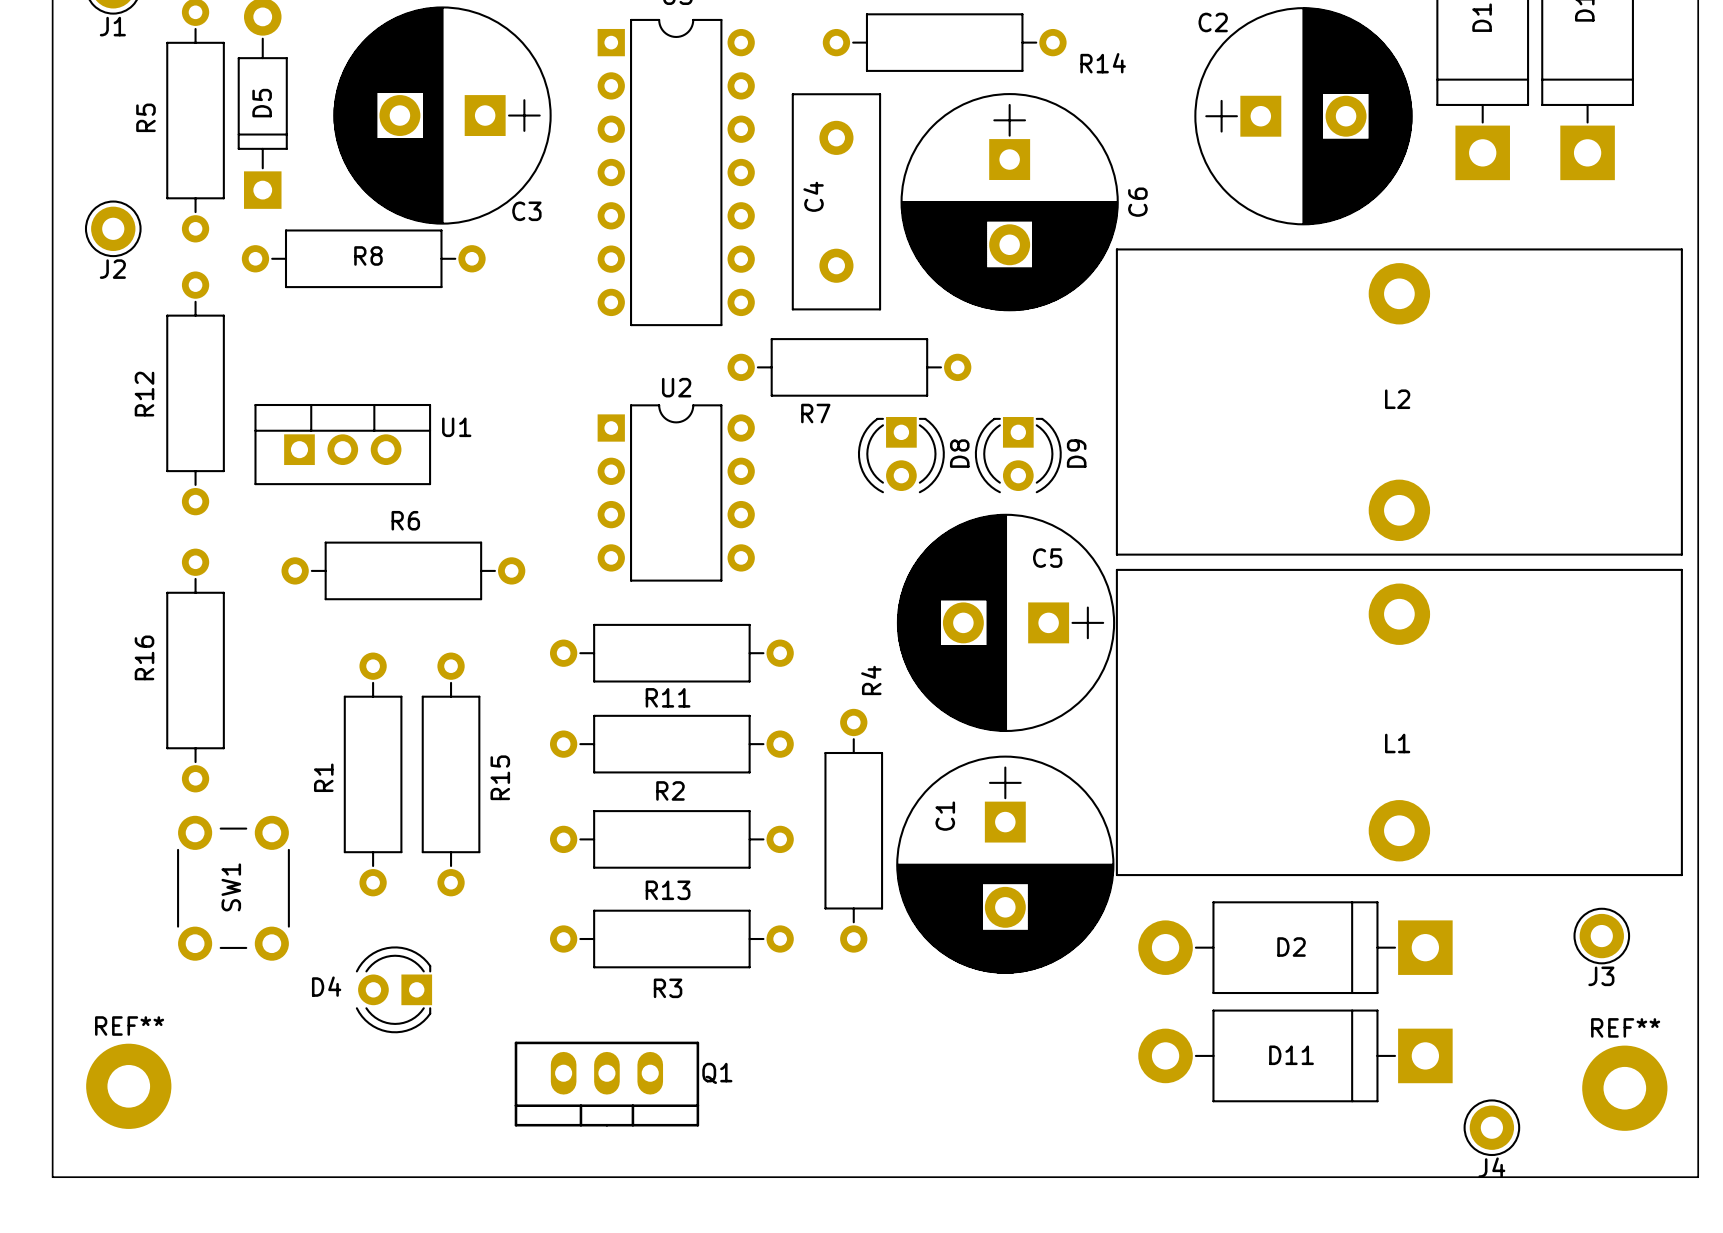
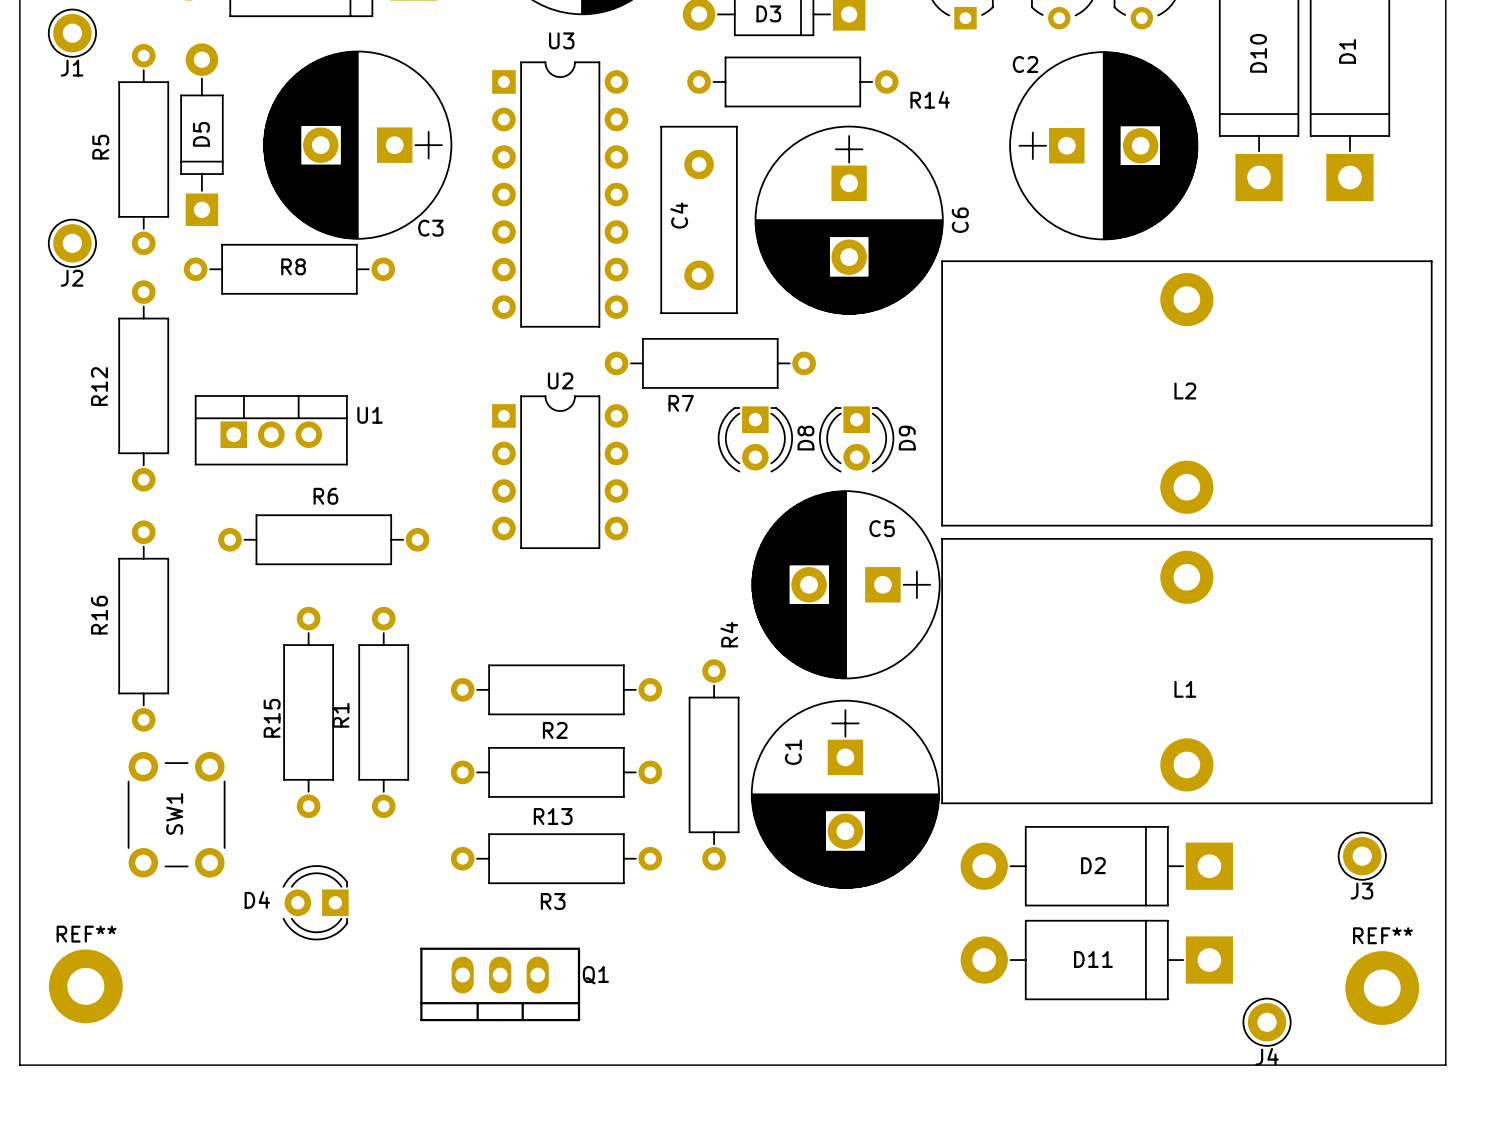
R11: (671, 653) -> none
R1 position: (373, 774) -> (383, 712)
R15 position: (451, 774) -> (308, 712)
R15 name position: R15 (500, 777) -> R15 (272, 718)

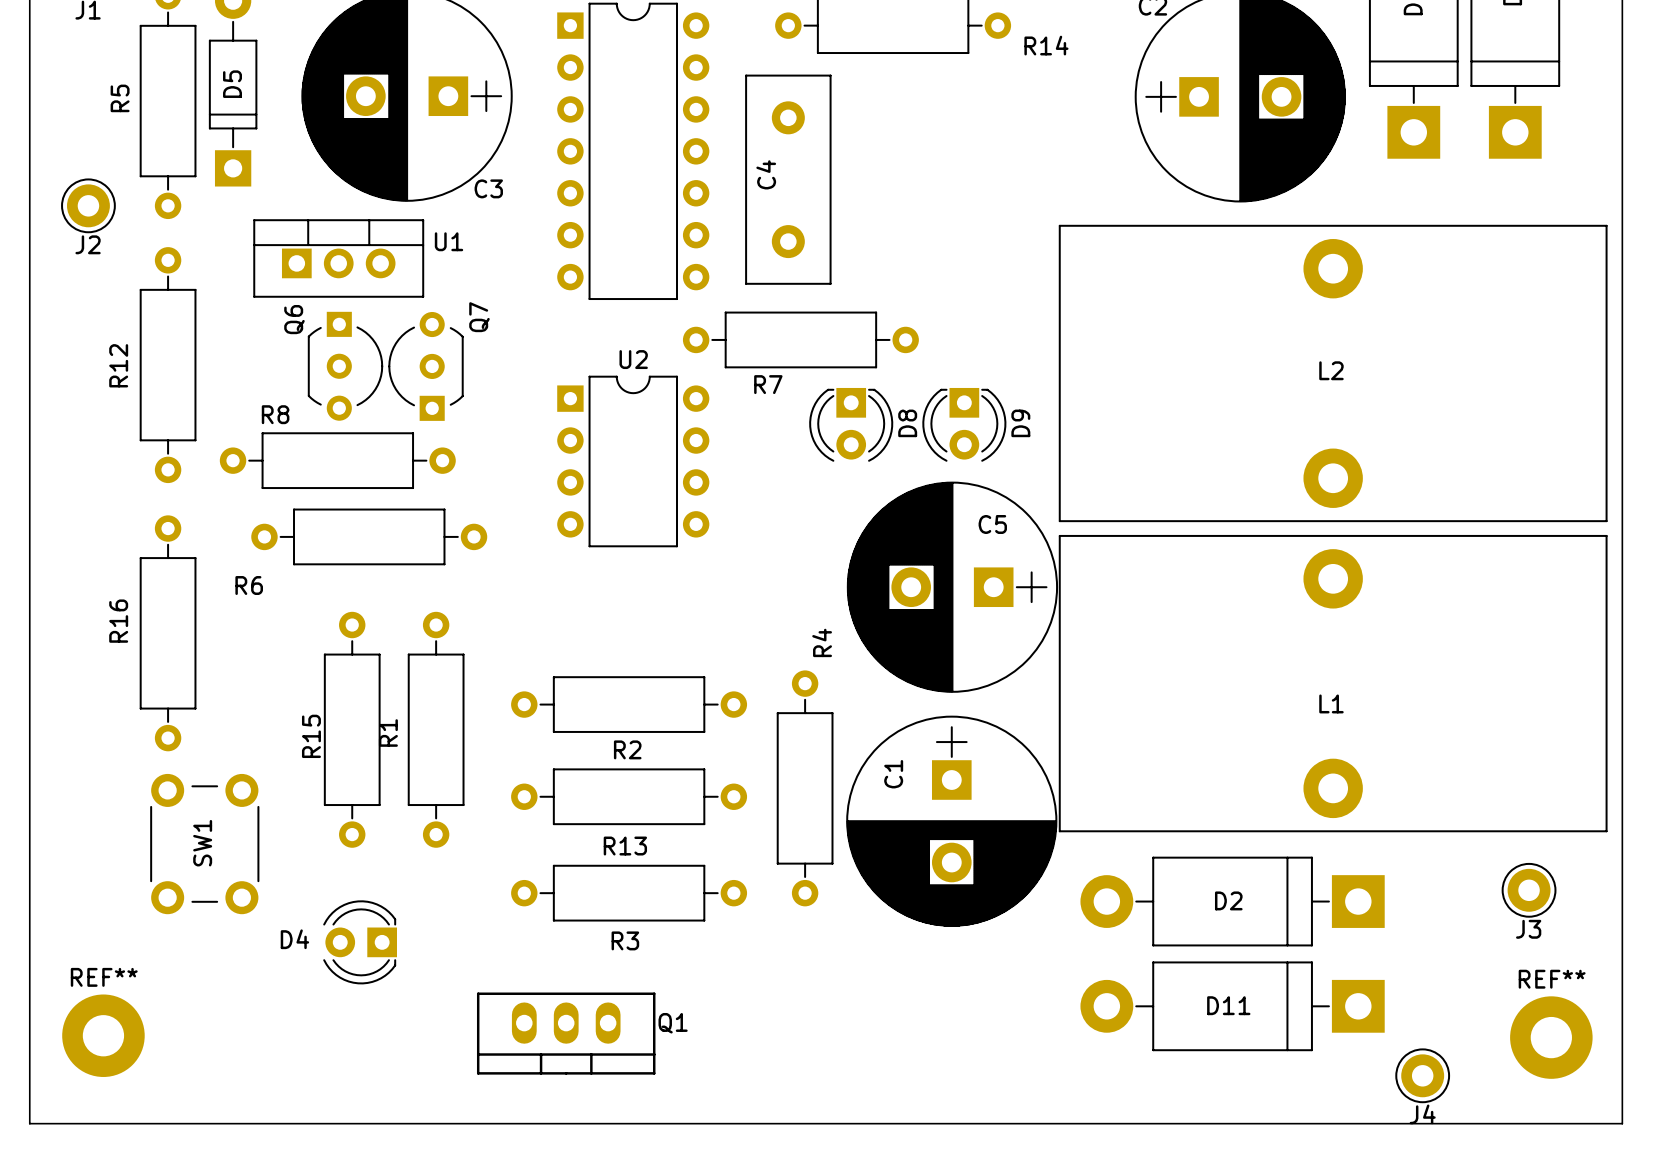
C6: (849, 220) -> none
R8 name position: R8 (293, 266) -> R8 (275, 414)
R8 position: (289, 269) -> (337, 460)
Q7: none -> (345, 366)
Q6: none -> (426, 366)
U1 position: (271, 430) -> (338, 258)
R6 name position: R6 (325, 496) -> R6 (249, 585)

